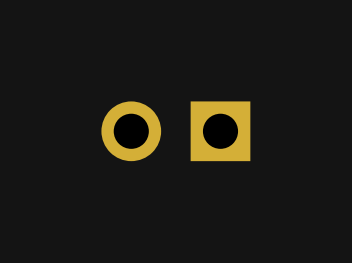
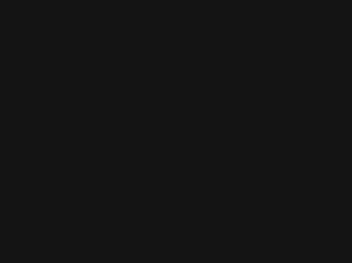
part: (175, 131) -> none

